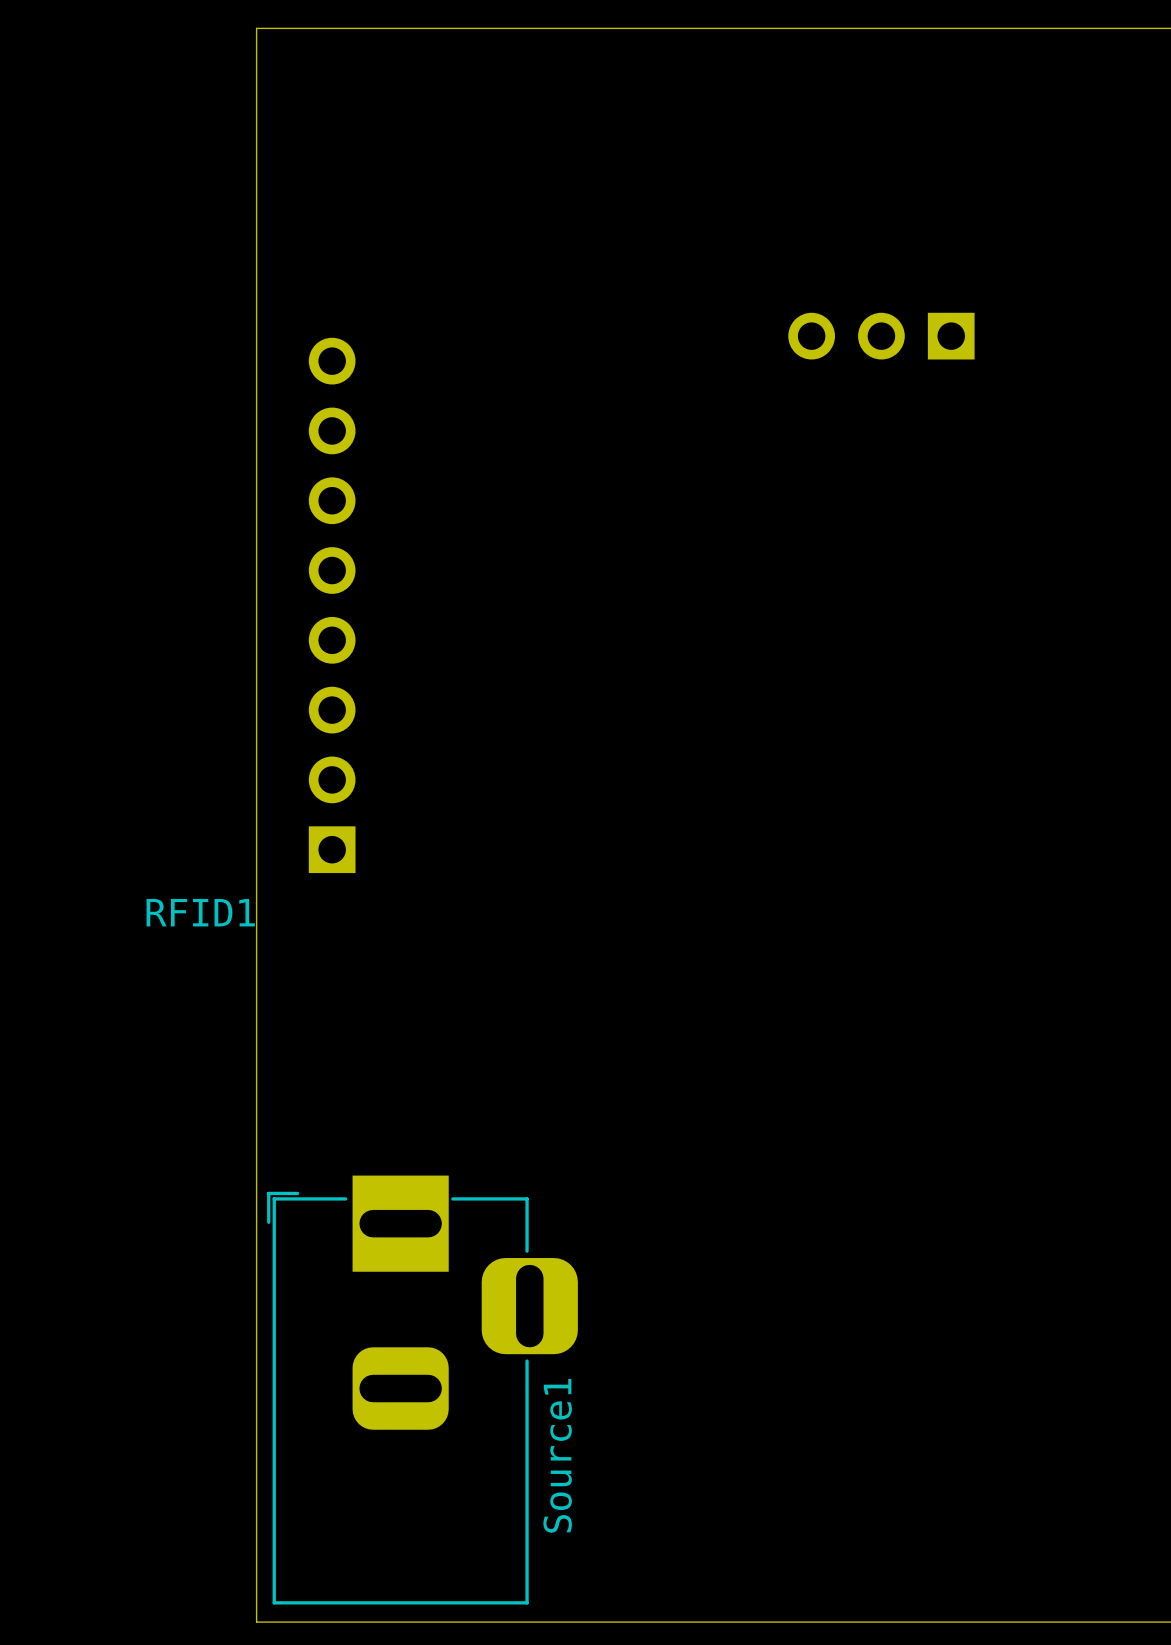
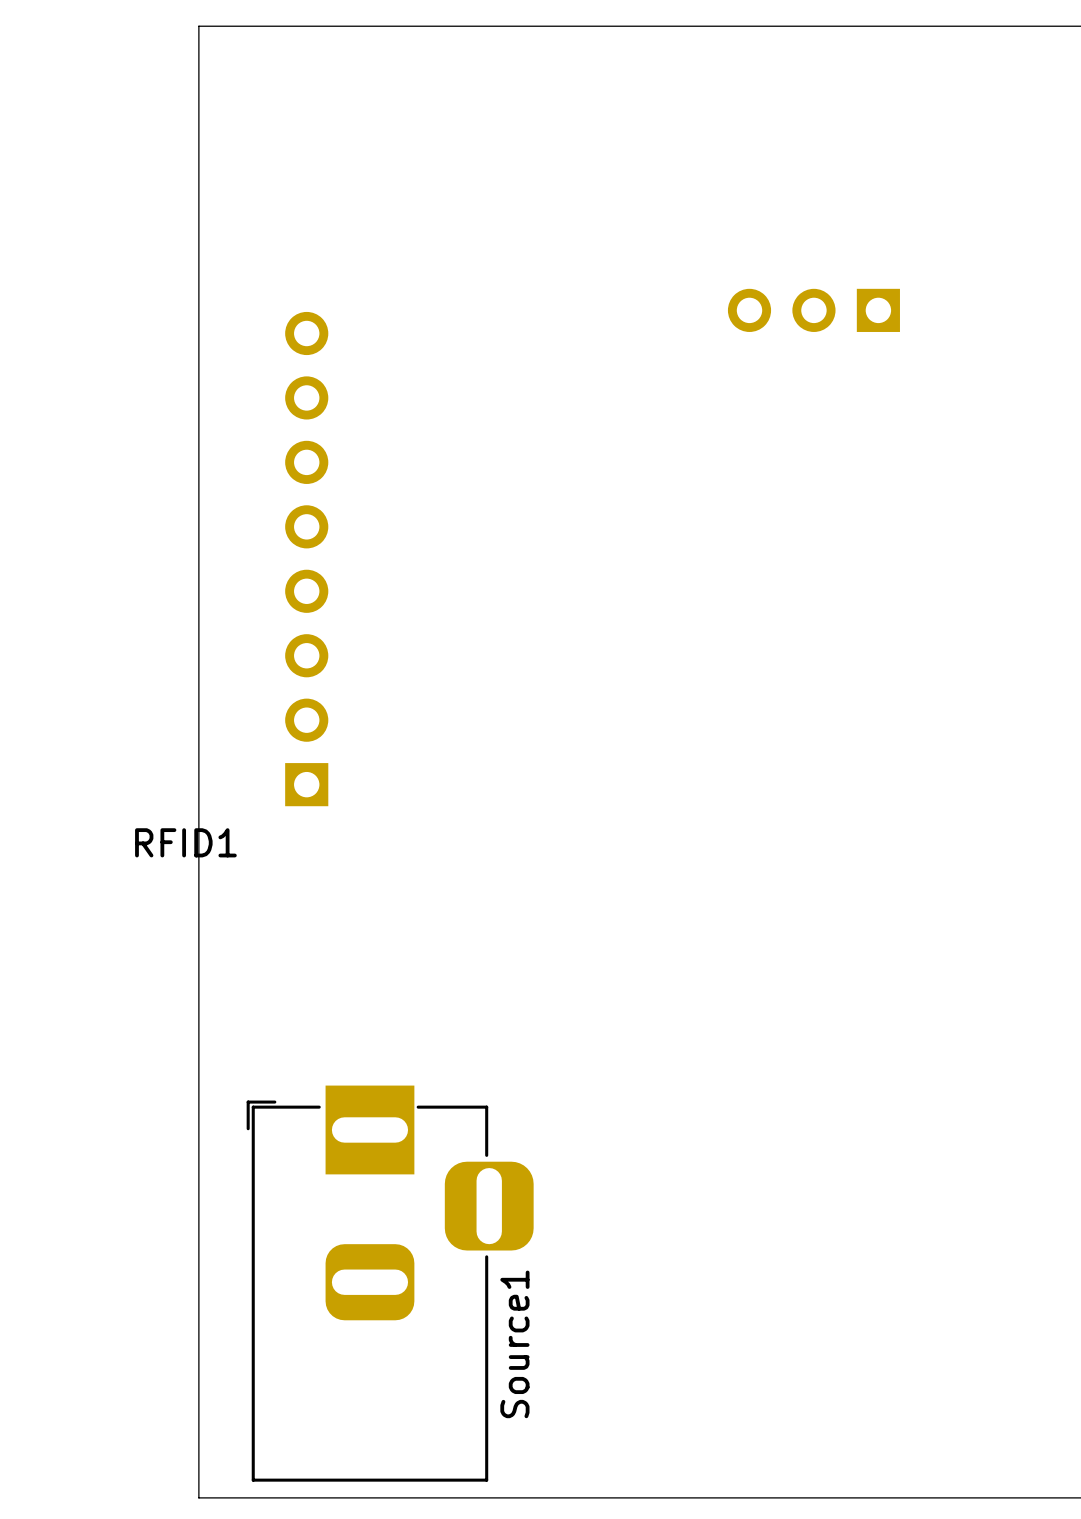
board edge: (256, 28) (256, 1622) -> (236, 26) (198, 26) (198, 1497) (236, 1497)

